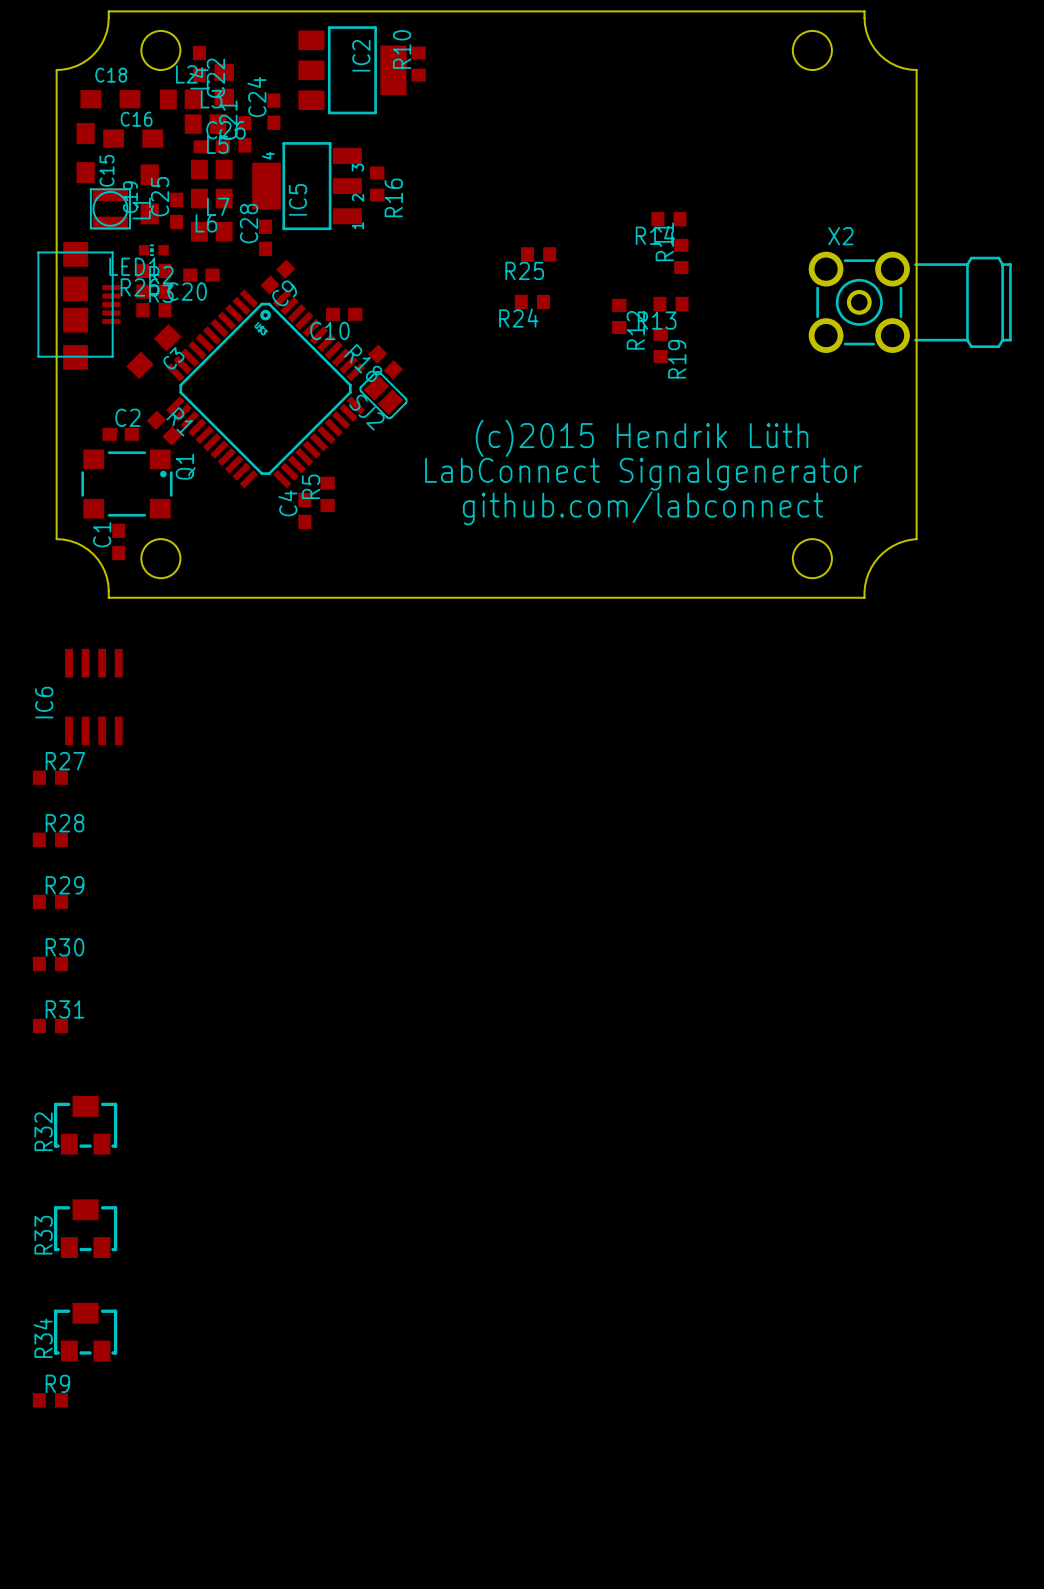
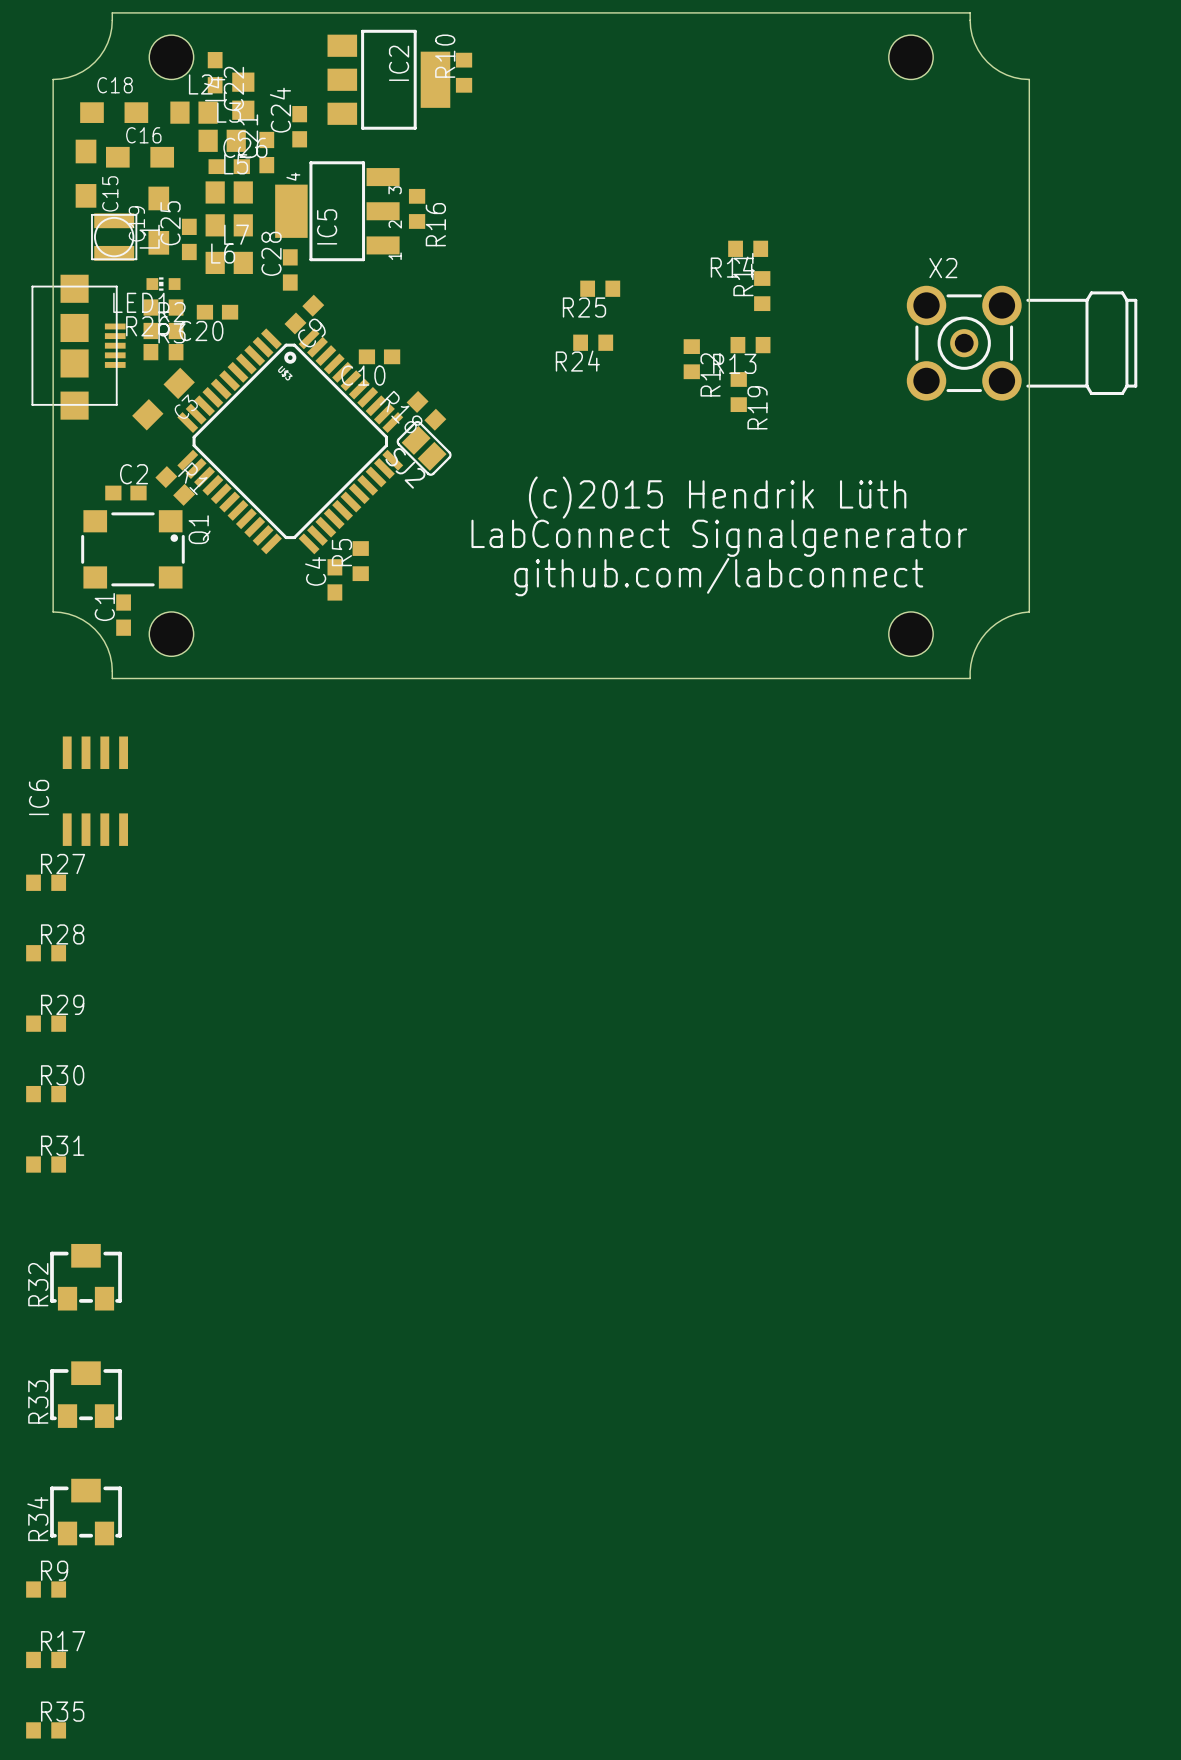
R17: none -> (46, 1659)
R35: none -> (46, 1730)

